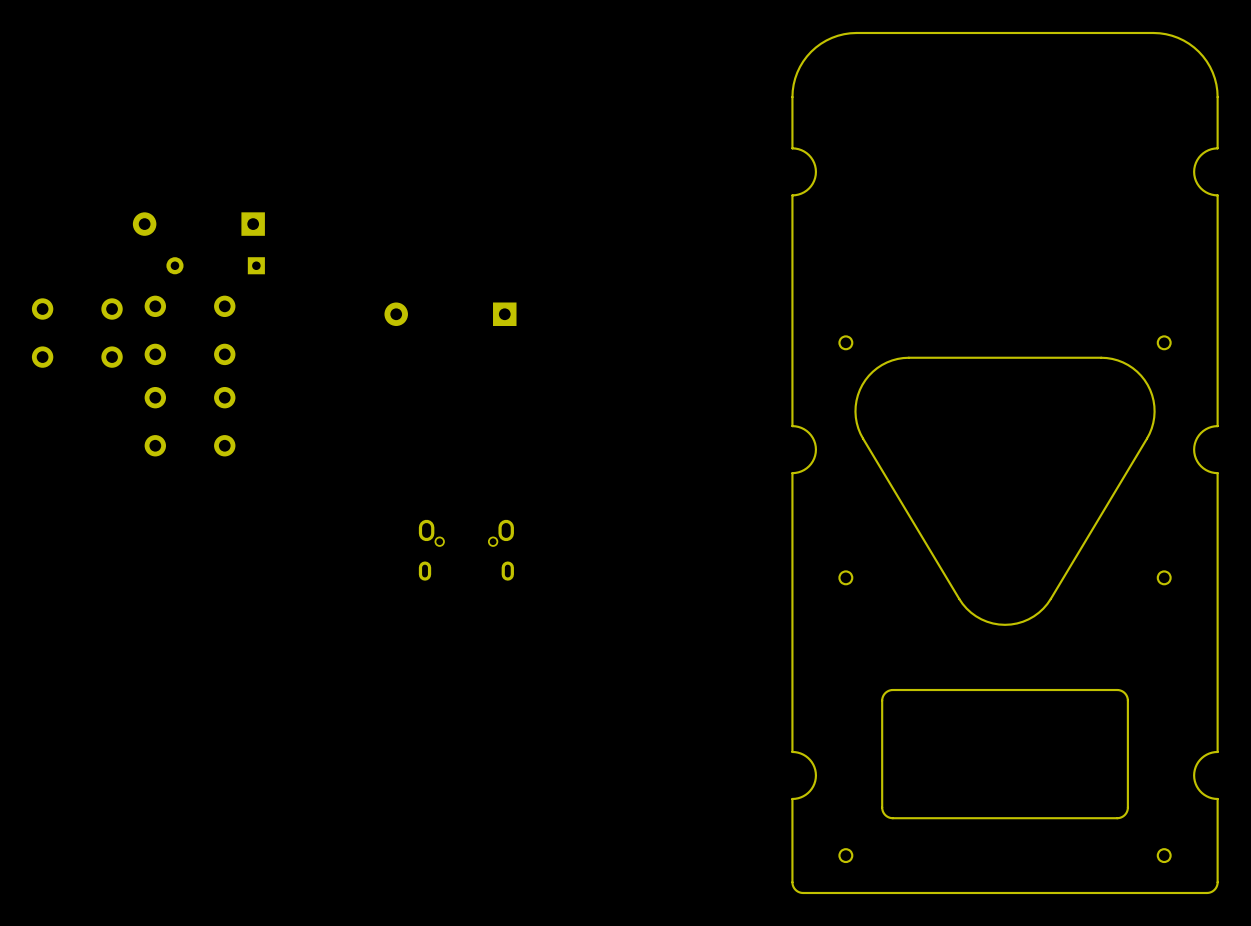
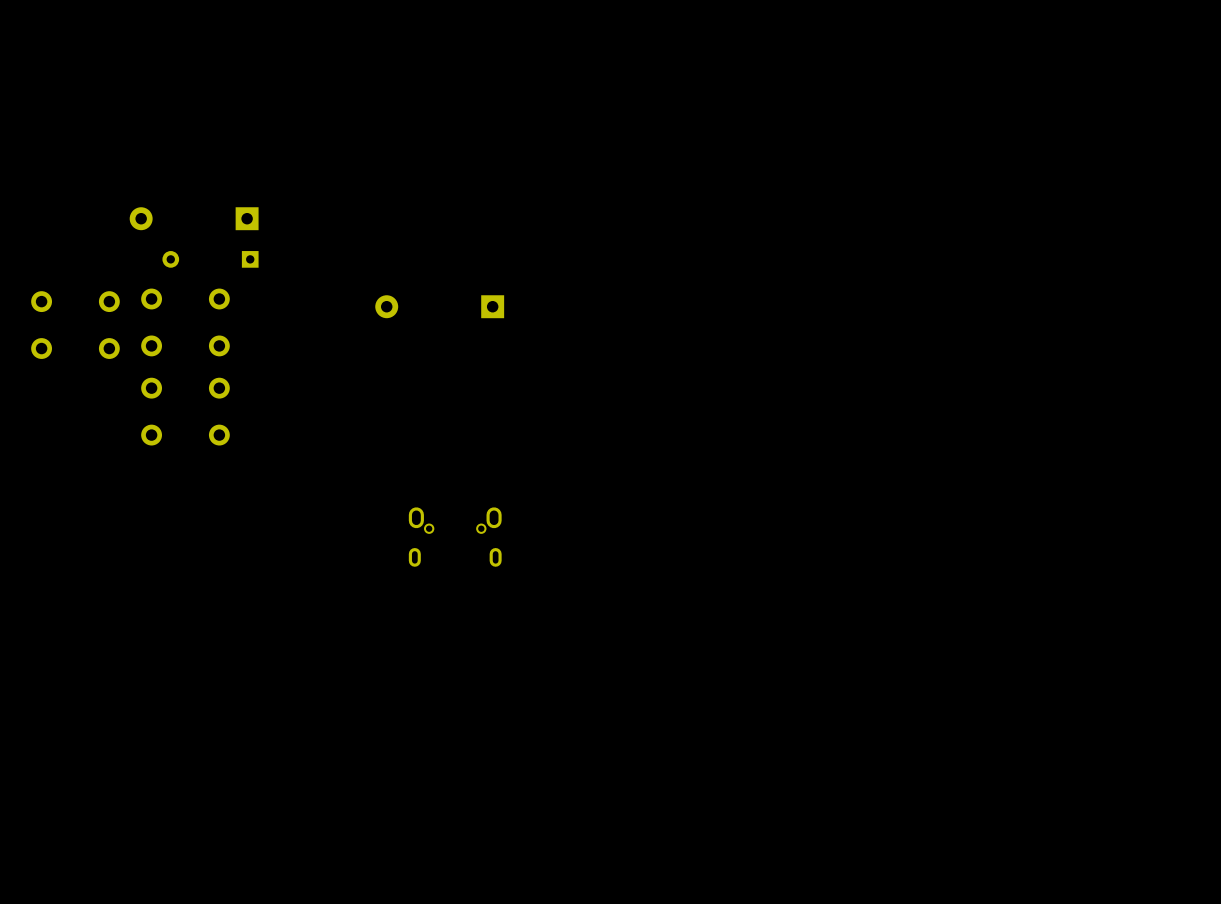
board edge: (1153, 32) (850, 33) (832, 37) (815, 47) (806, 56) (797, 72) (792, 90) (792, 148) (801, 150) (809, 155) (814, 162) (815, 171) (814, 180) (809, 188) (801, 193) (792, 195) (792, 426) (801, 427) (809, 433) (814, 440) (815, 449) (814, 458) (809, 466) (801, 471) (792, 473) (792, 751) (803, 754) (810, 759) (814, 767) (815, 775) (813, 786) (808, 793) (800, 797) (792, 798) (792, 883) (794, 888) (799, 892) (1206, 892) (1213, 890) (1217, 885) (1217, 798) (1206, 796) (1200, 791) (1195, 783) (1194, 775) (1195, 767) (1200, 759) (1206, 754) (1217, 751) (1217, 473) (1208, 471) (1201, 466) (1195, 458) (1194, 449) (1195, 440) (1201, 433) (1208, 427) (1217, 426) (1217, 195) (1208, 193) (1201, 188) (1195, 180) (1194, 171) (1195, 162) (1201, 155) (1208, 150) (1217, 148) (1217, 90) (1210, 66) (1194, 47) (1172, 35) (1153, 32) -> none
round board edge: [838, 335, 854, 351] -> none
round board edge: [1156, 335, 1172, 351] -> none
board edge: (1101, 357) (903, 358) (892, 360) (877, 368) (865, 380) (859, 389) (855, 411) (860, 433) (959, 598) (971, 612) (981, 619) (998, 624) (1017, 623) (1033, 616) (1043, 608) (1149, 433) (1154, 411) (1152, 395) (1147, 384) (1137, 371) (1128, 365) (1117, 360) (1101, 357) -> none
round board edge: [838, 570, 854, 586] -> none
round board edge: [1156, 570, 1172, 586] -> none
board edge: (1117, 690) (888, 691) (883, 695) (882, 700) (883, 812) (887, 816) (892, 818) (1121, 817) (1126, 813) (1127, 807) (1127, 700) (1124, 693) (1117, 690) -> none
round board edge: [838, 848, 854, 864] -> none
round board edge: [1156, 848, 1172, 864] -> none

